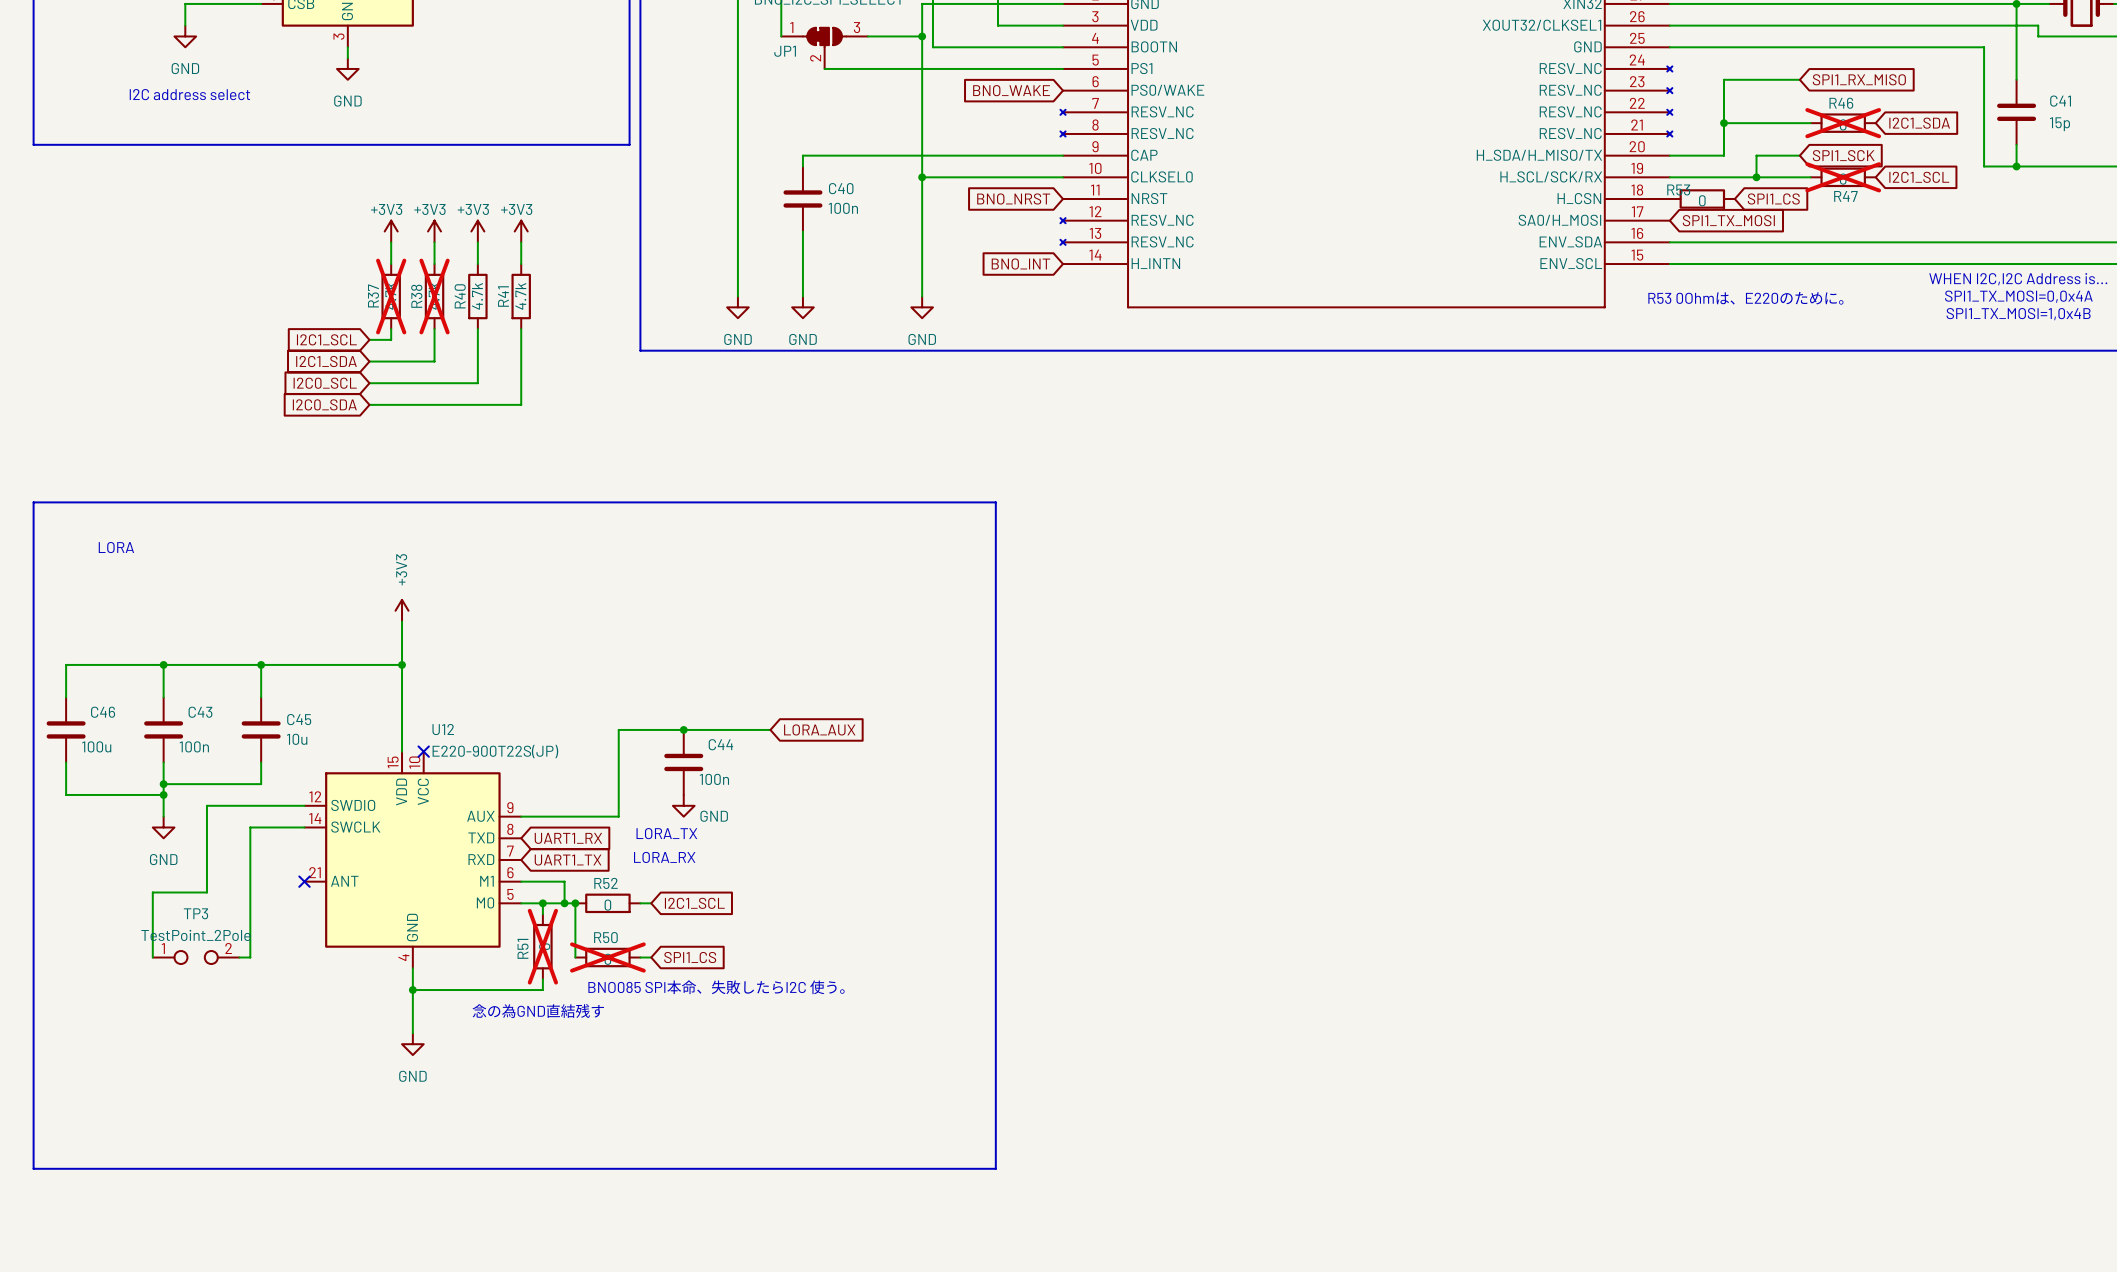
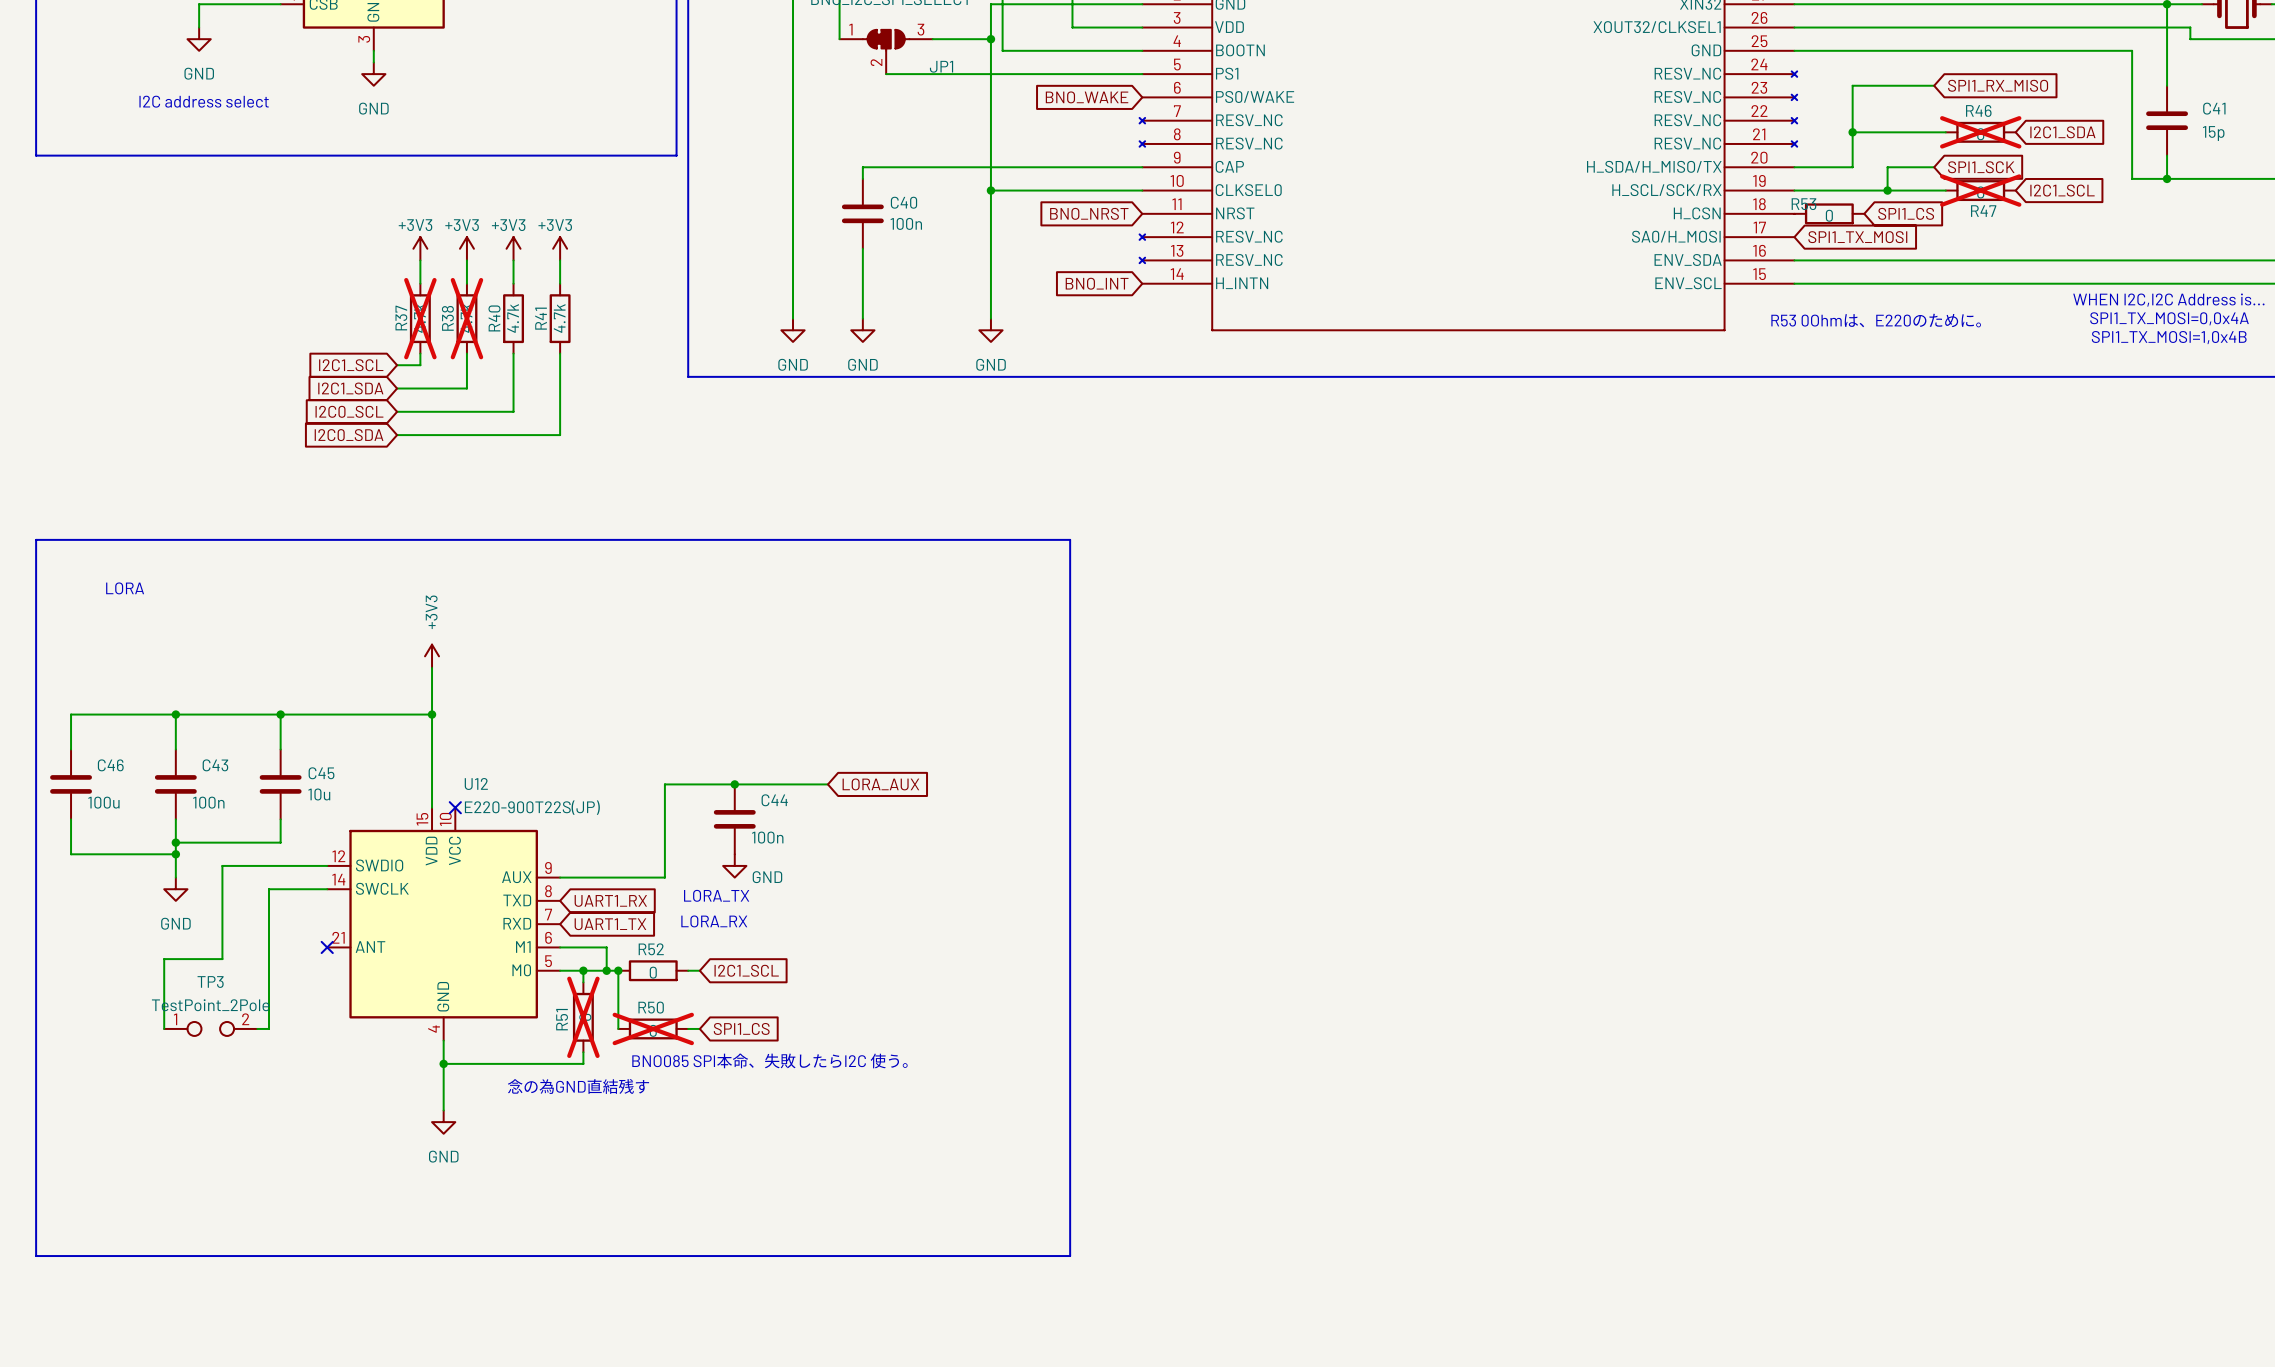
JP1 name position: JP1 (785, 51) -> JP1 (941, 66)

